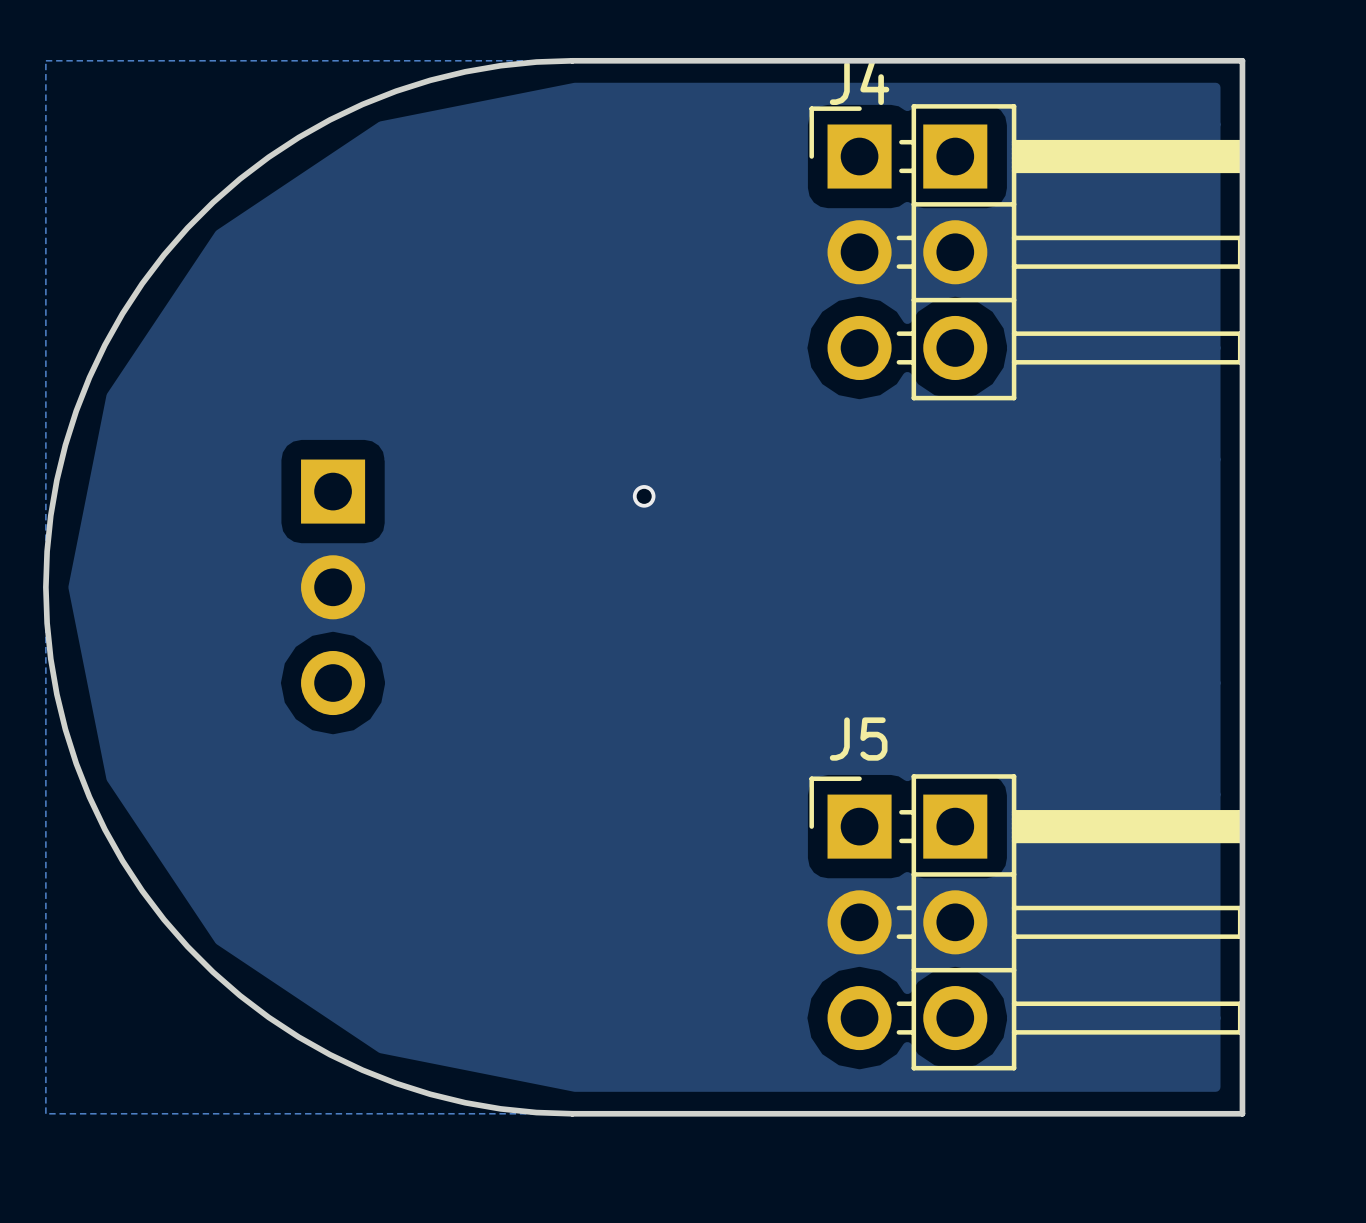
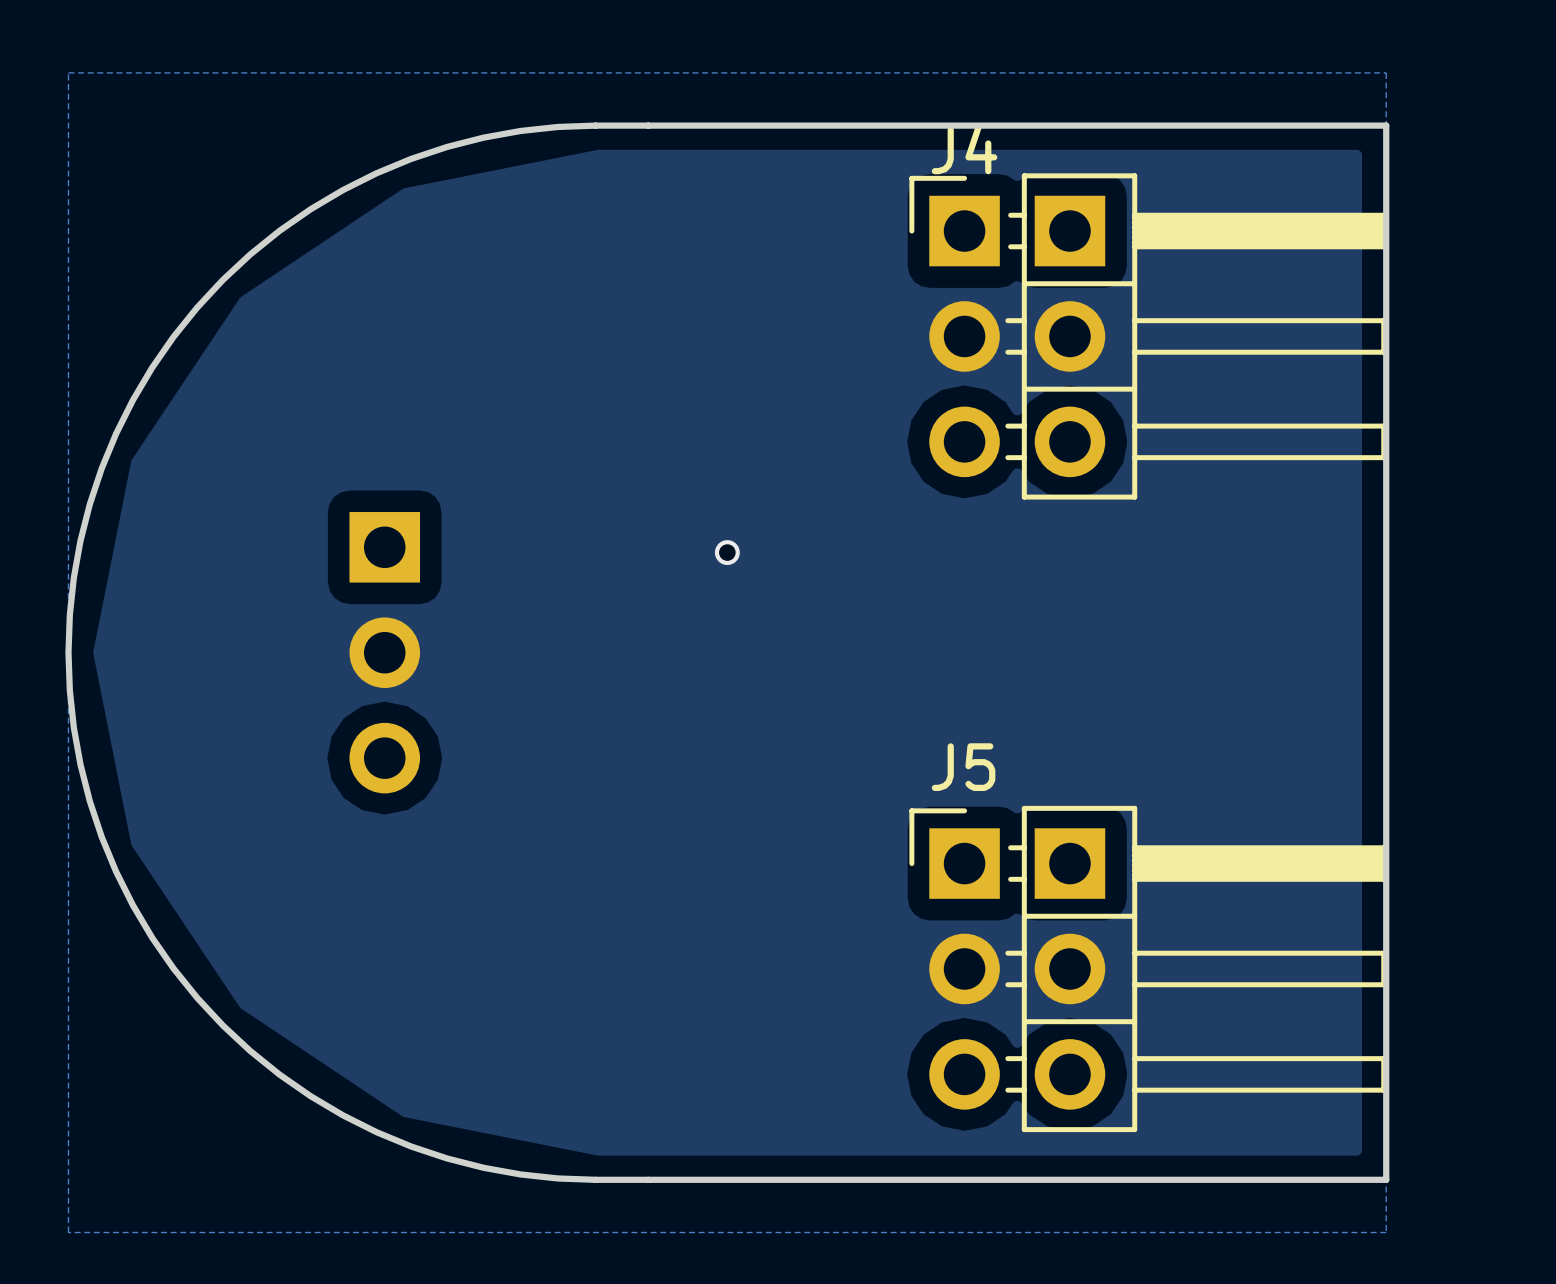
board edge: (1242, 108) (1242, 60) (536, 62) (465, 71) (396, 91) (362, 104) (298, 137) (240, 178) (187, 227) (142, 283) (104, 345) (76, 410) (65, 445) (50, 515) (45, 587) (50, 658) (65, 729) (76, 763) (104, 829) (142, 890) (187, 946) (240, 995) (298, 1037) (362, 1070) (396, 1083) (465, 1102) (536, 1112) (1242, 1113) (1242, 1065) -> (1386, 125) (595, 125) (520, 130) (483, 137) (411, 158) (342, 190) (279, 230) (250, 254) (197, 307) (152, 367) (116, 433) (89, 504) (73, 577) (68, 652) (73, 727) (89, 801) (116, 871) (152, 937) (197, 997) (250, 1051) (279, 1074) (342, 1115) (411, 1146) (483, 1167) (520, 1174) (595, 1179) (1386, 1179)
part position: (955, 252) -> (1069, 336)
J4 position: (1025, 252) -> (1147, 336)
part position: (955, 922) -> (1069, 968)
J5 position: (1025, 922) -> (1147, 968)

